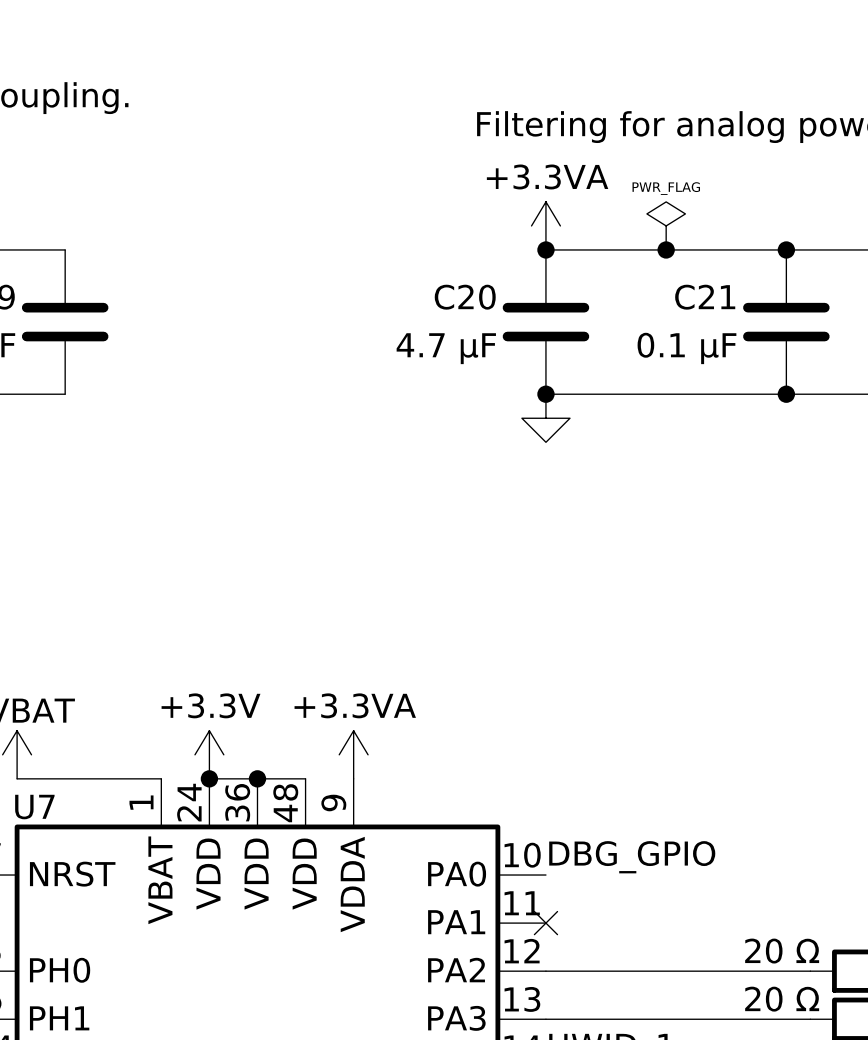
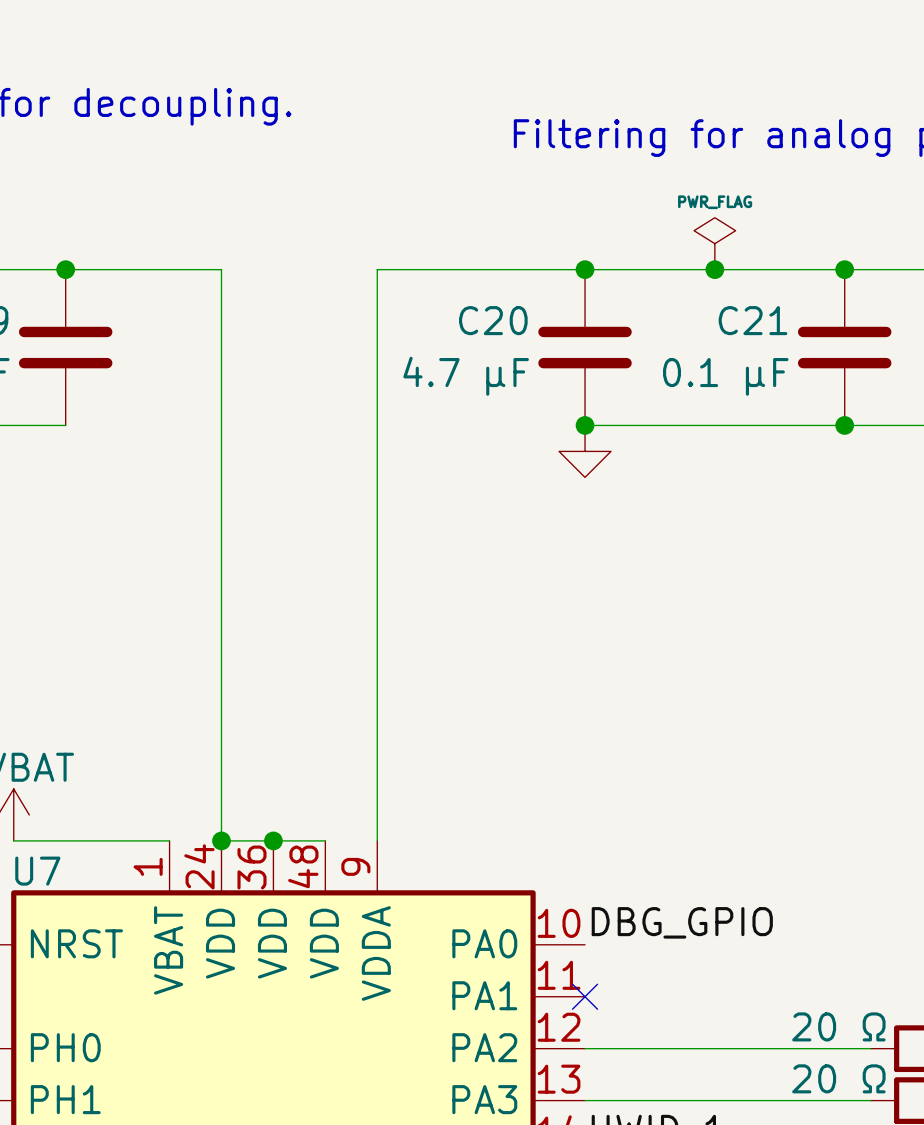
power symbol: +3.3VA (545, 225) -> none
wire: none -> (65, 269) (221, 269) (221, 840)
junction: none -> (65, 269)
wire: none -> (585, 269) (377, 269) (377, 840)
power symbol: +3.3V (209, 754) -> none
power symbol: +3.3VA (353, 754) -> none

